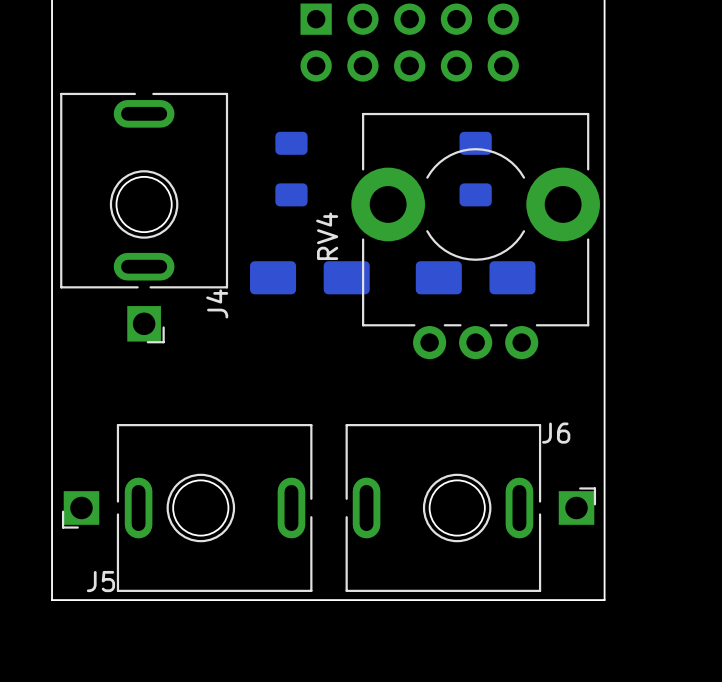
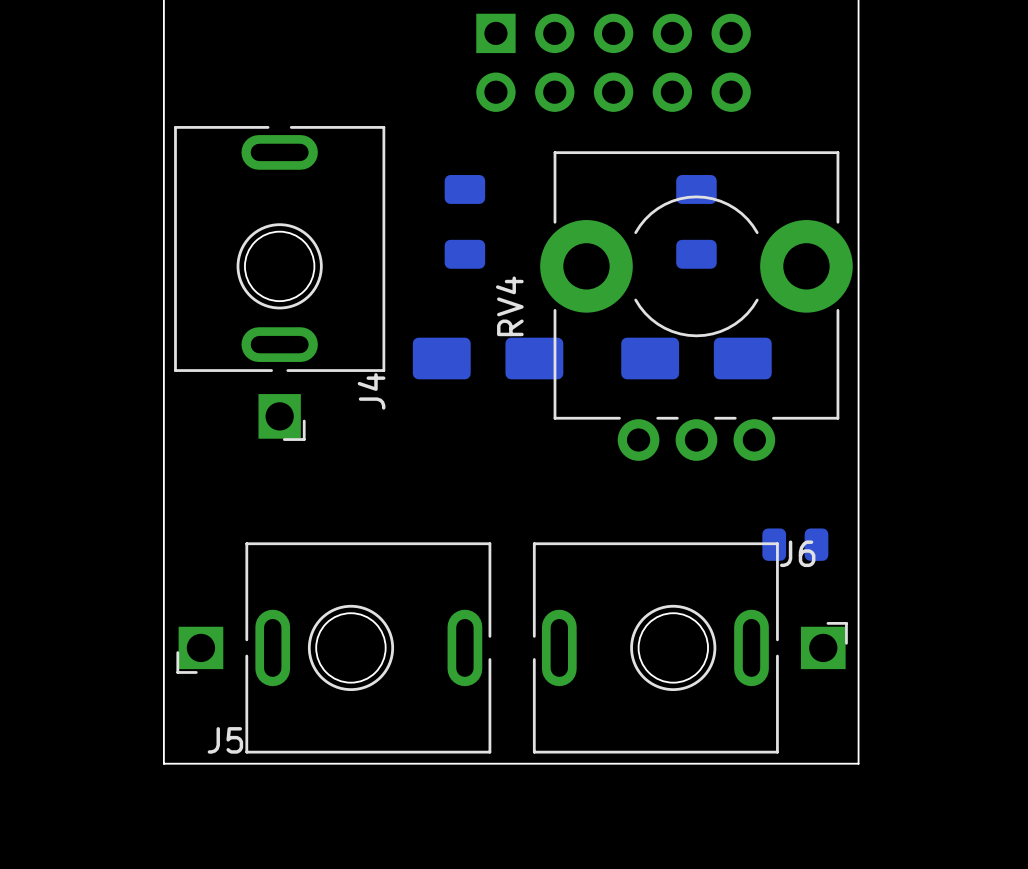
part: none -> (795, 544)

